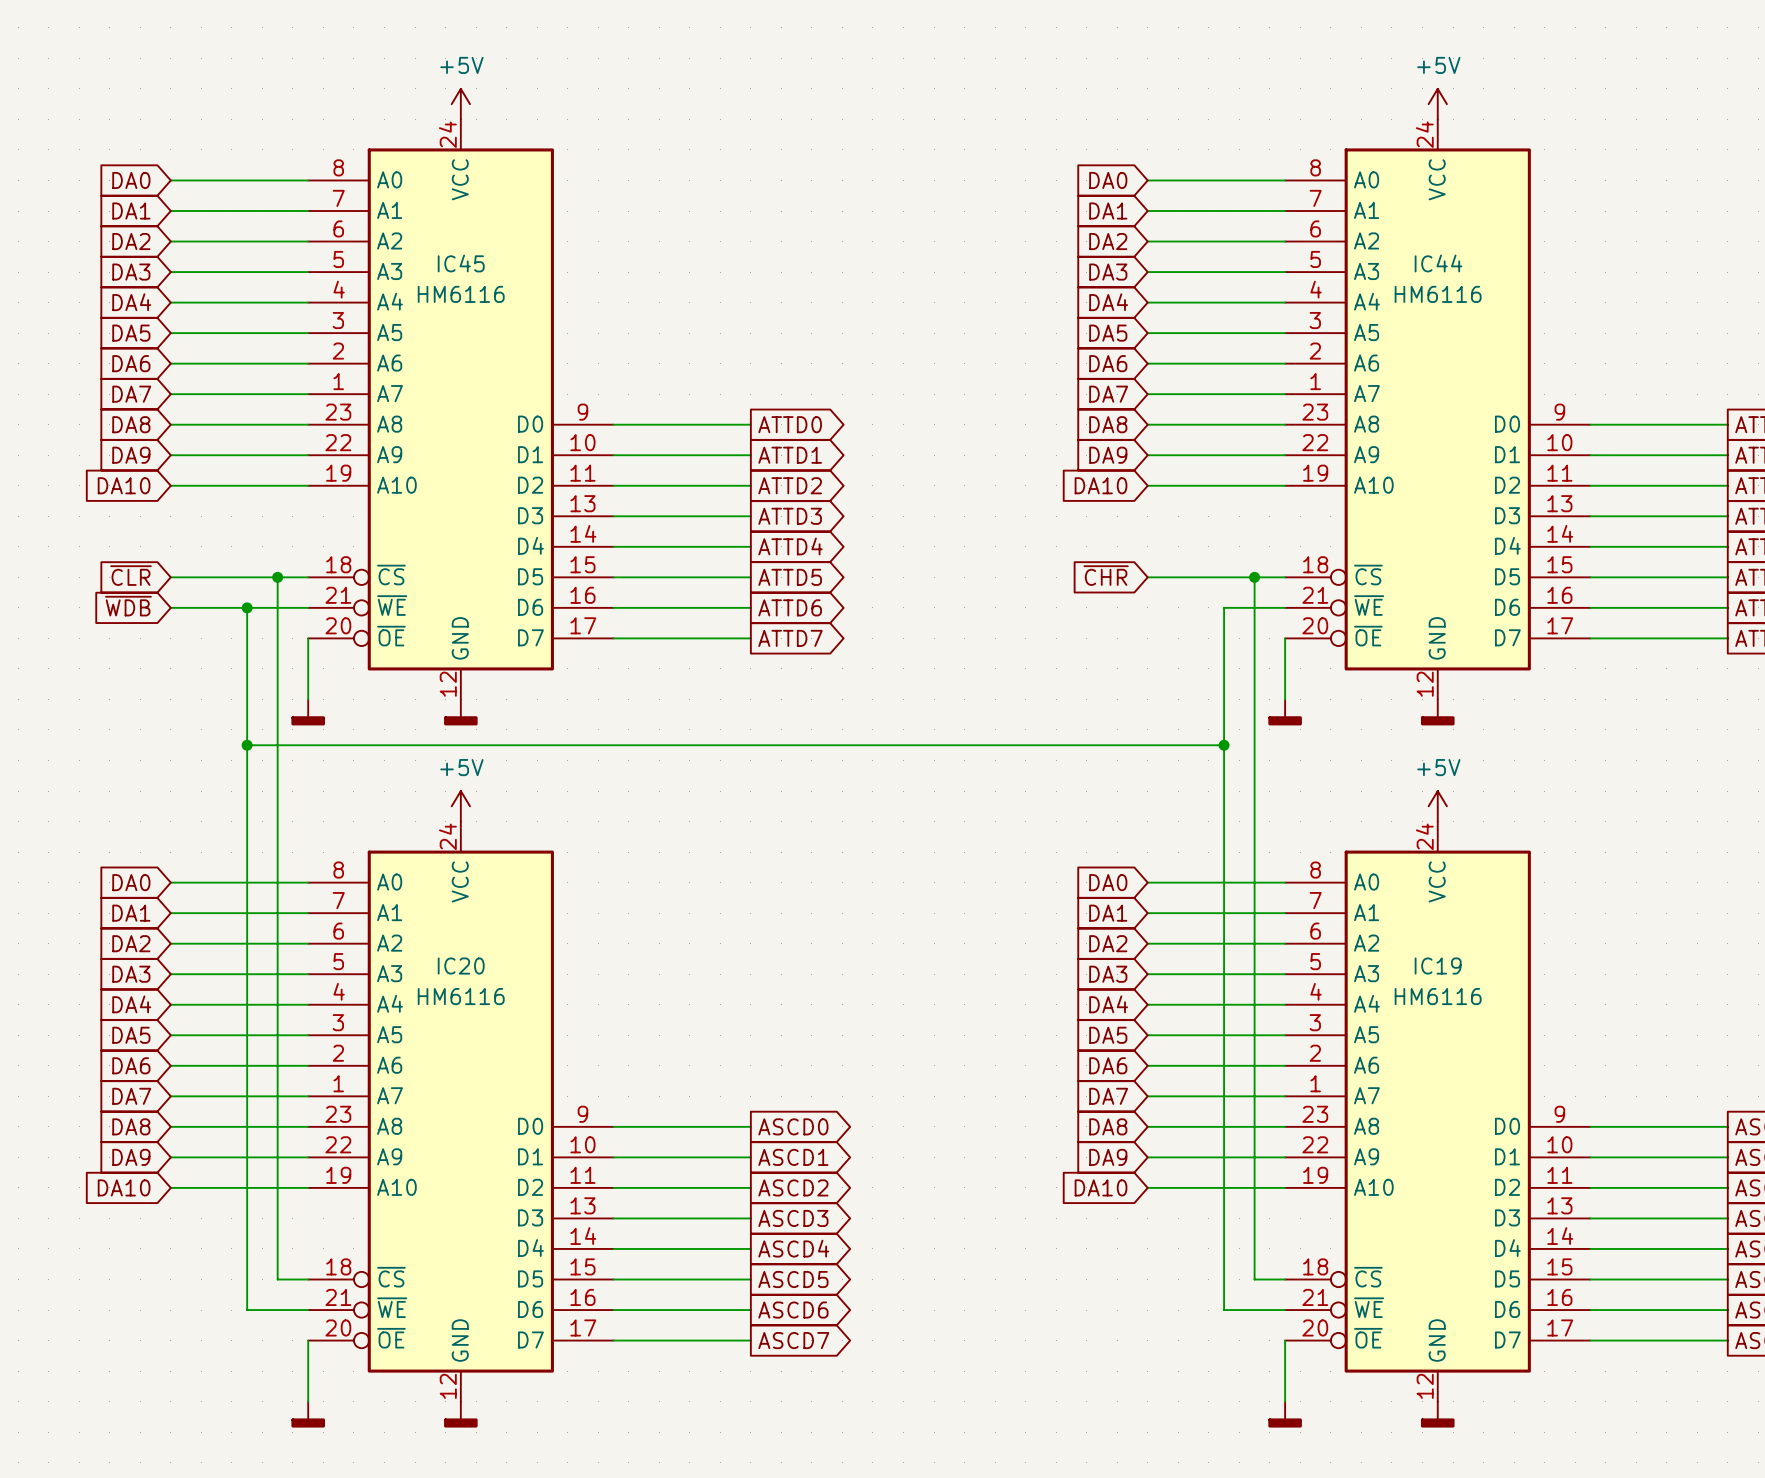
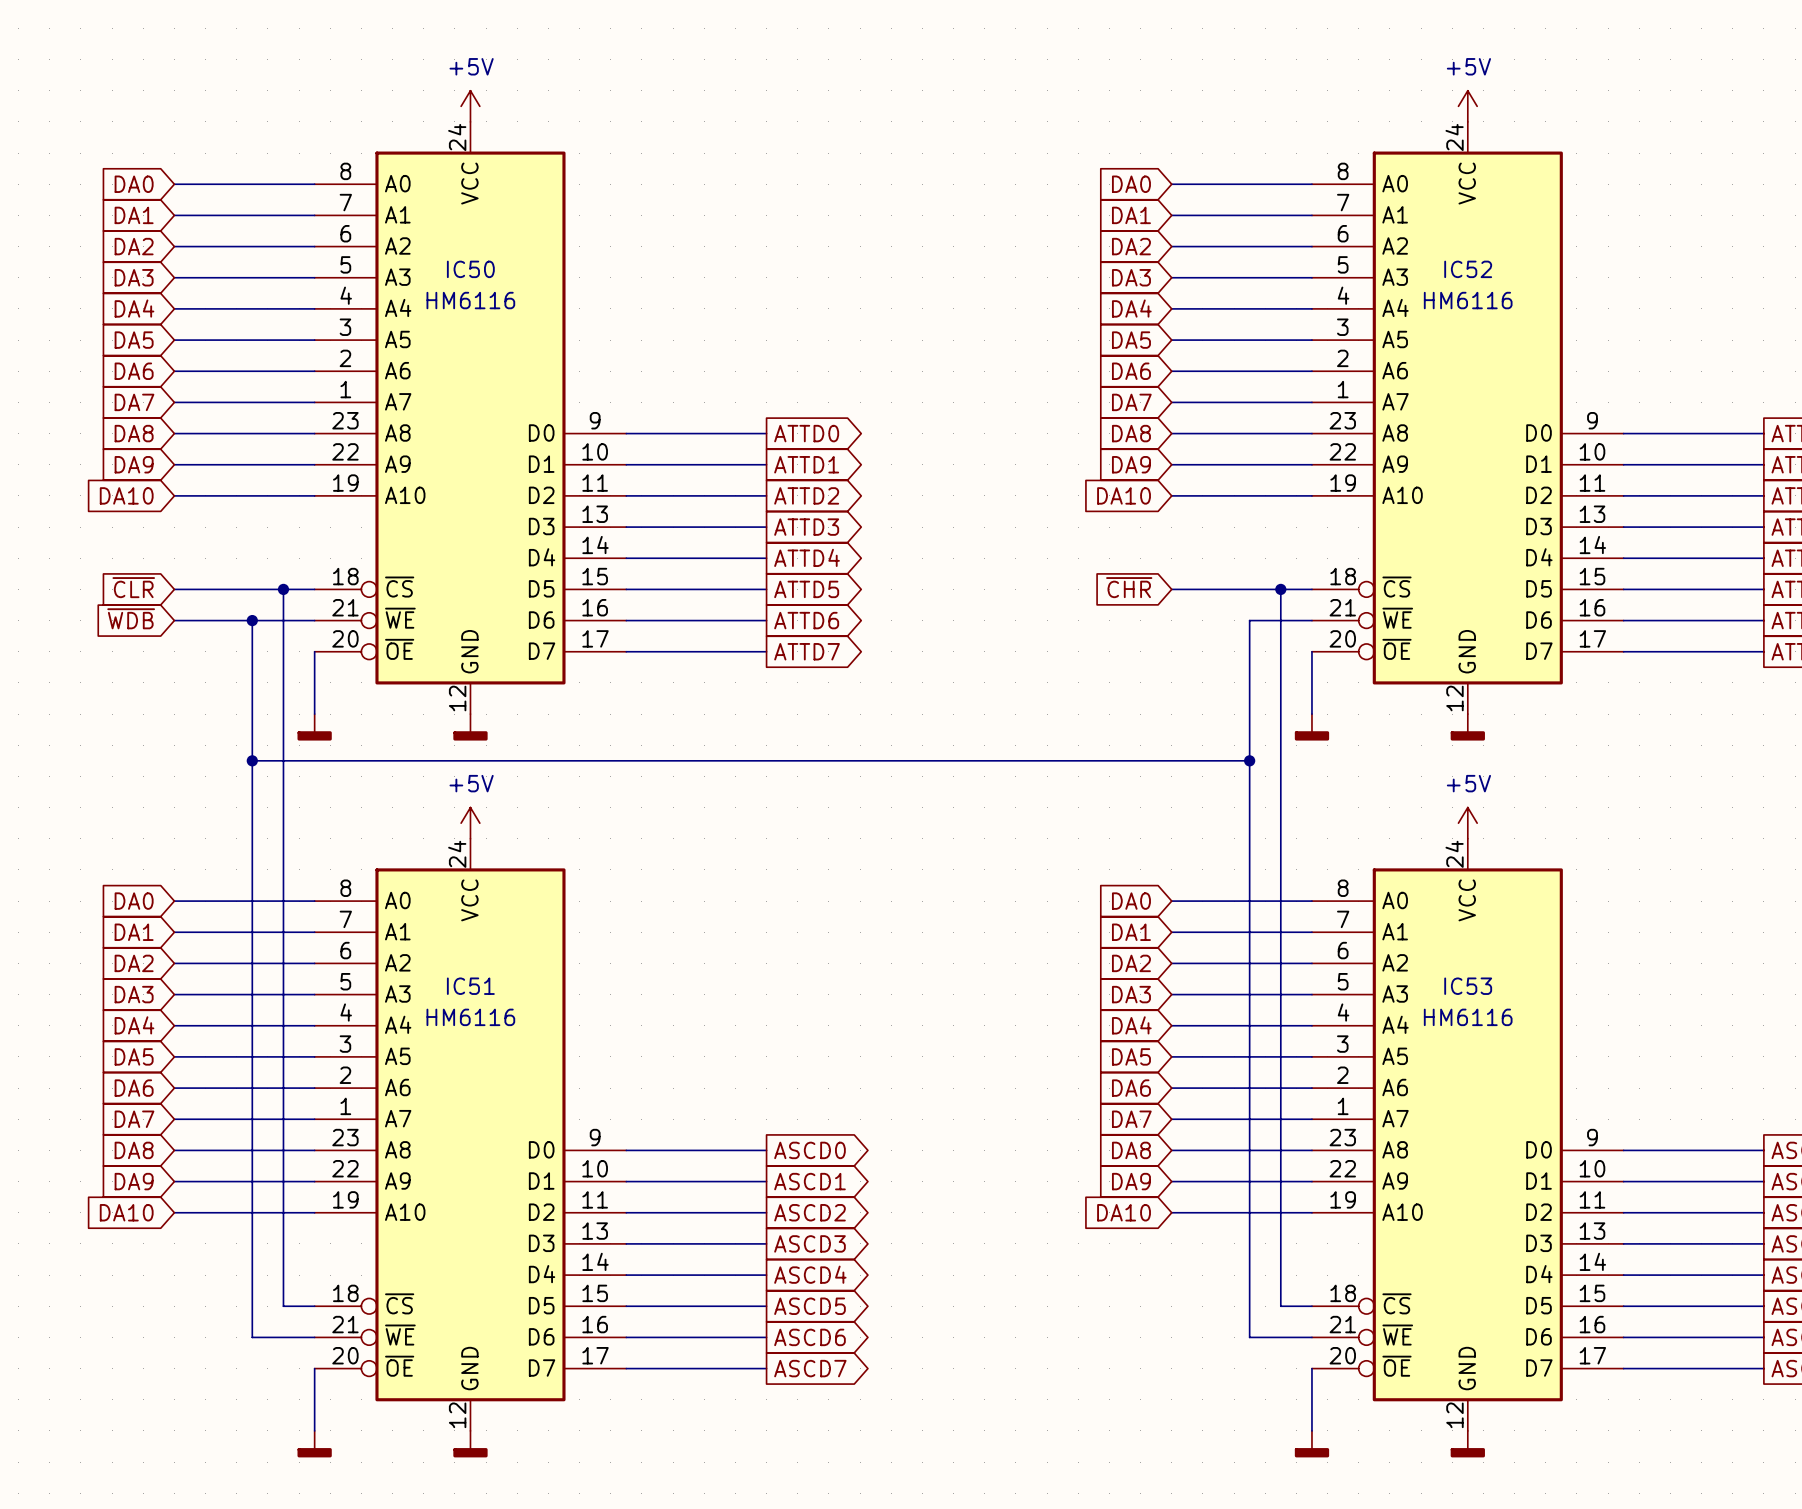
IC45 name: IC45 (461, 263) -> IC50 (470, 269)
IC44 name: IC44 (1438, 263) -> IC52 (1468, 269)
IC20 name: IC20 (461, 966) -> IC51 (470, 986)
IC19 name: IC19 (1438, 966) -> IC53 (1468, 986)

